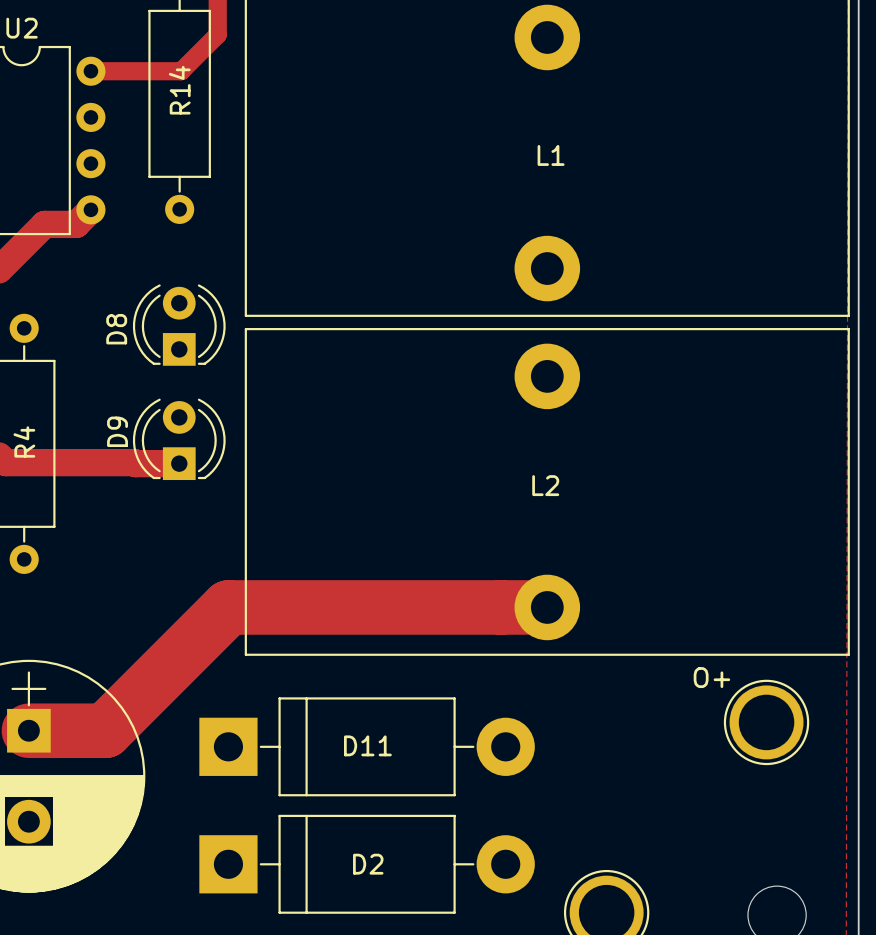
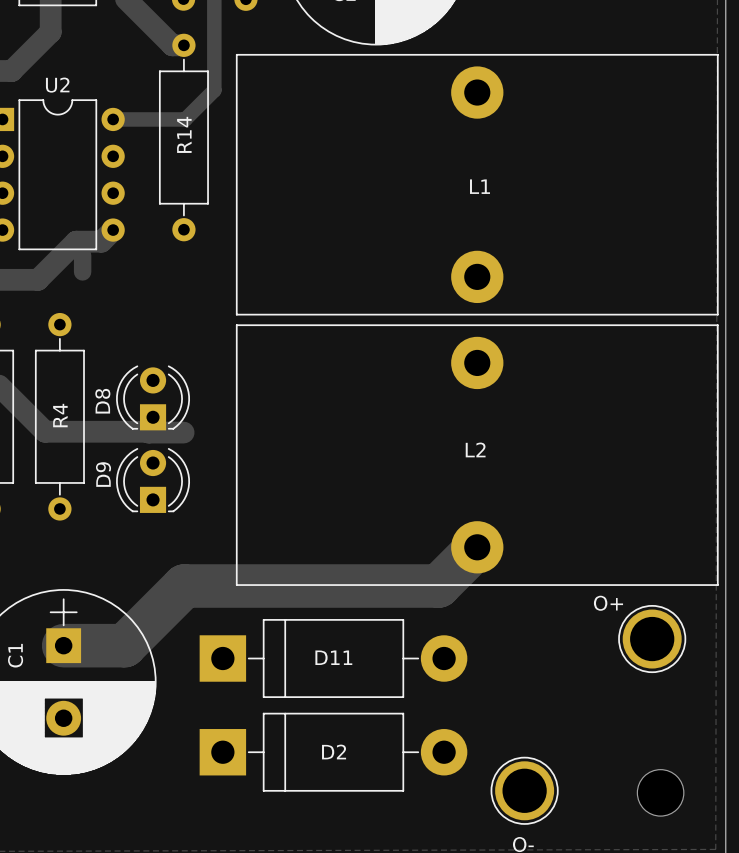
track: none -> (82, 255) (82, 271)
D8 position: (179, 325) -> (153, 397)
D9 position: (179, 439) -> (153, 480)
track: (547, 607) (228, 607) (180, 655) -> (477, 547) (438, 586) (184, 586)

